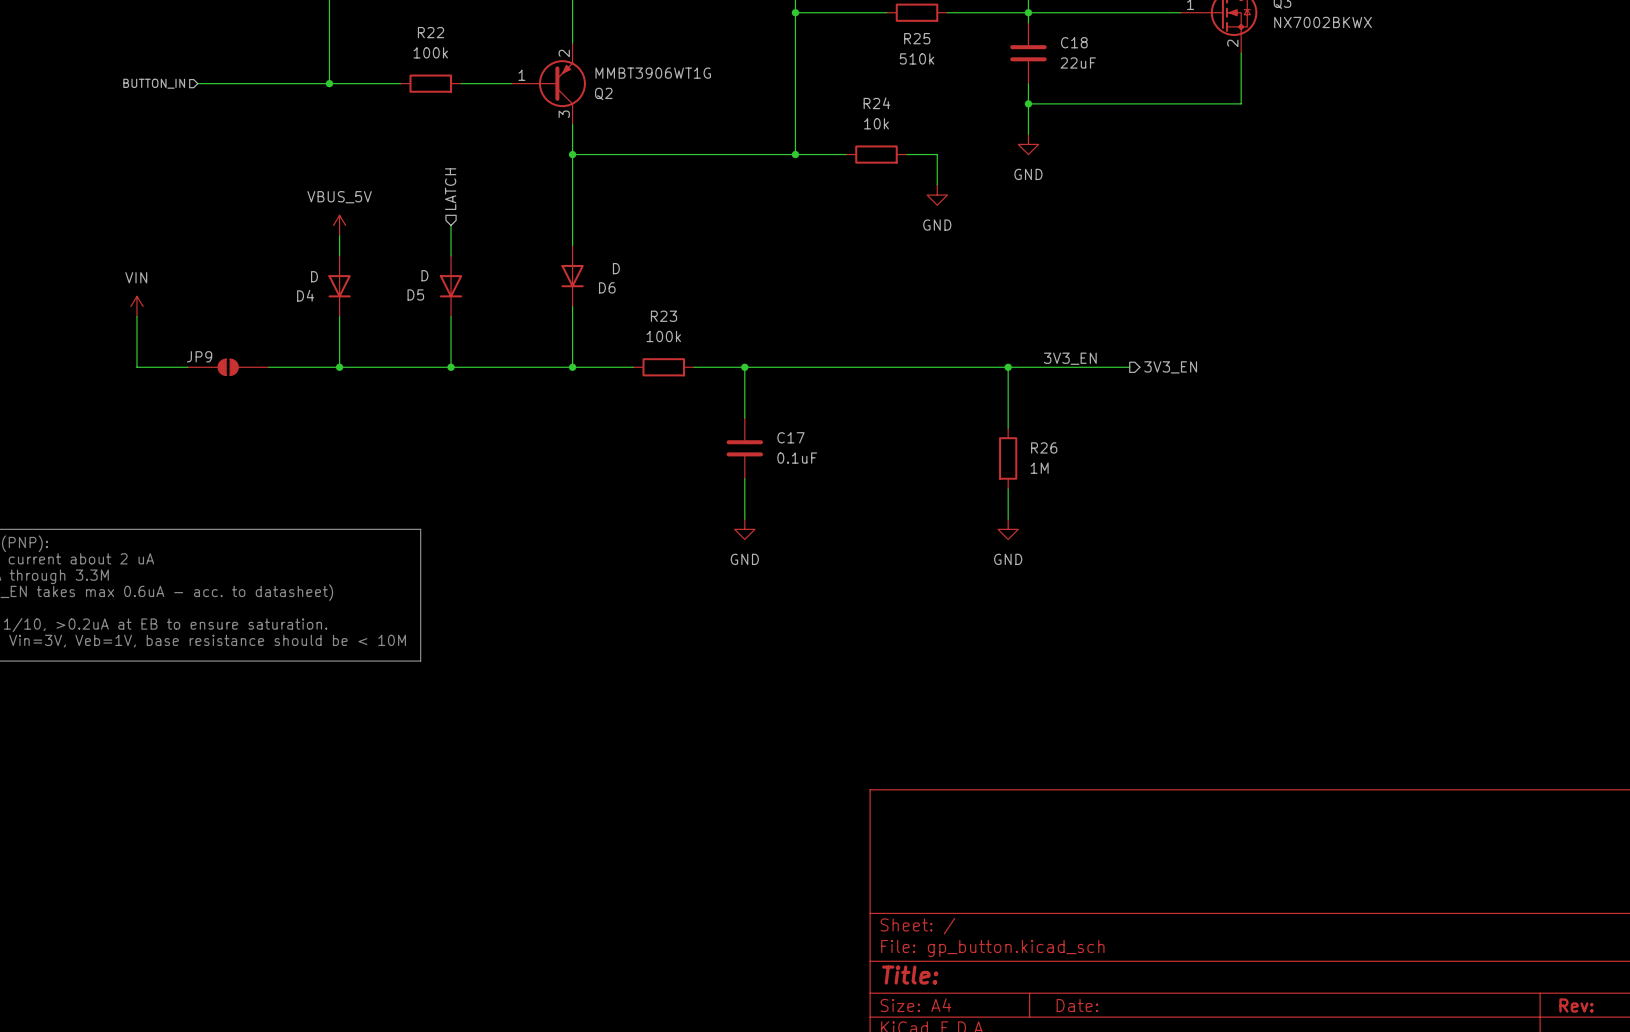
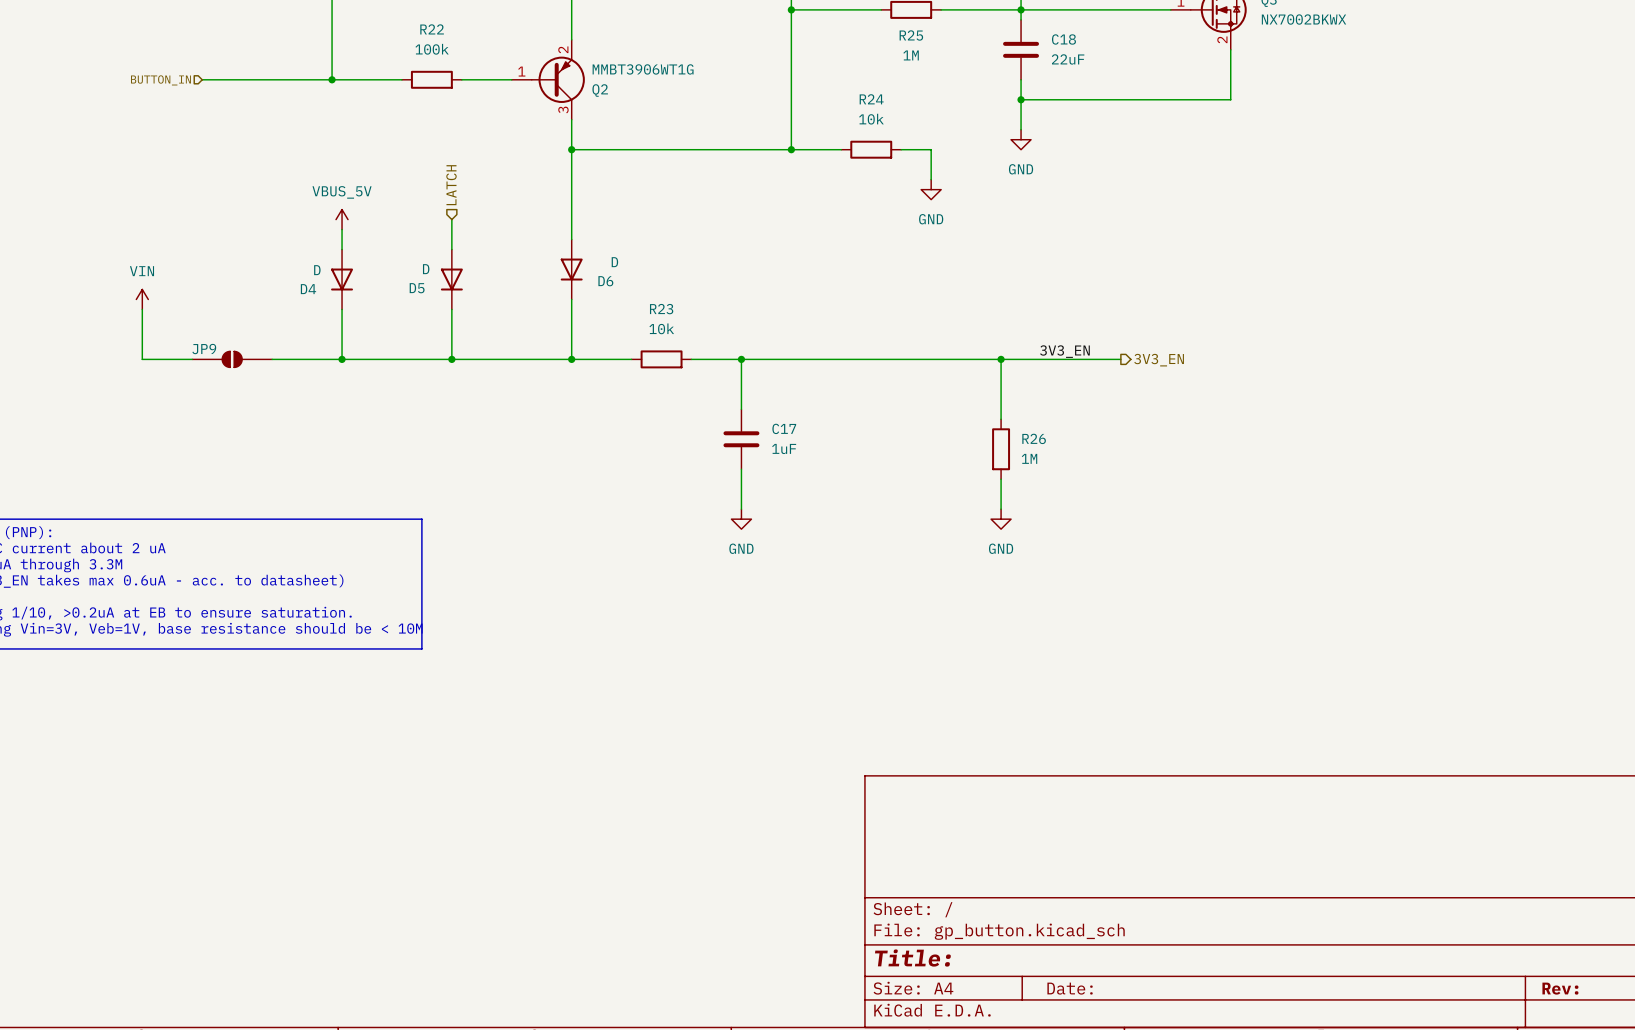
R25 value: 510k (917, 58) -> 1M (911, 55)
R23 value: 100k (663, 336) -> 10k (661, 328)
C17 value: 0.1uF (797, 458) -> 1uF (784, 448)

